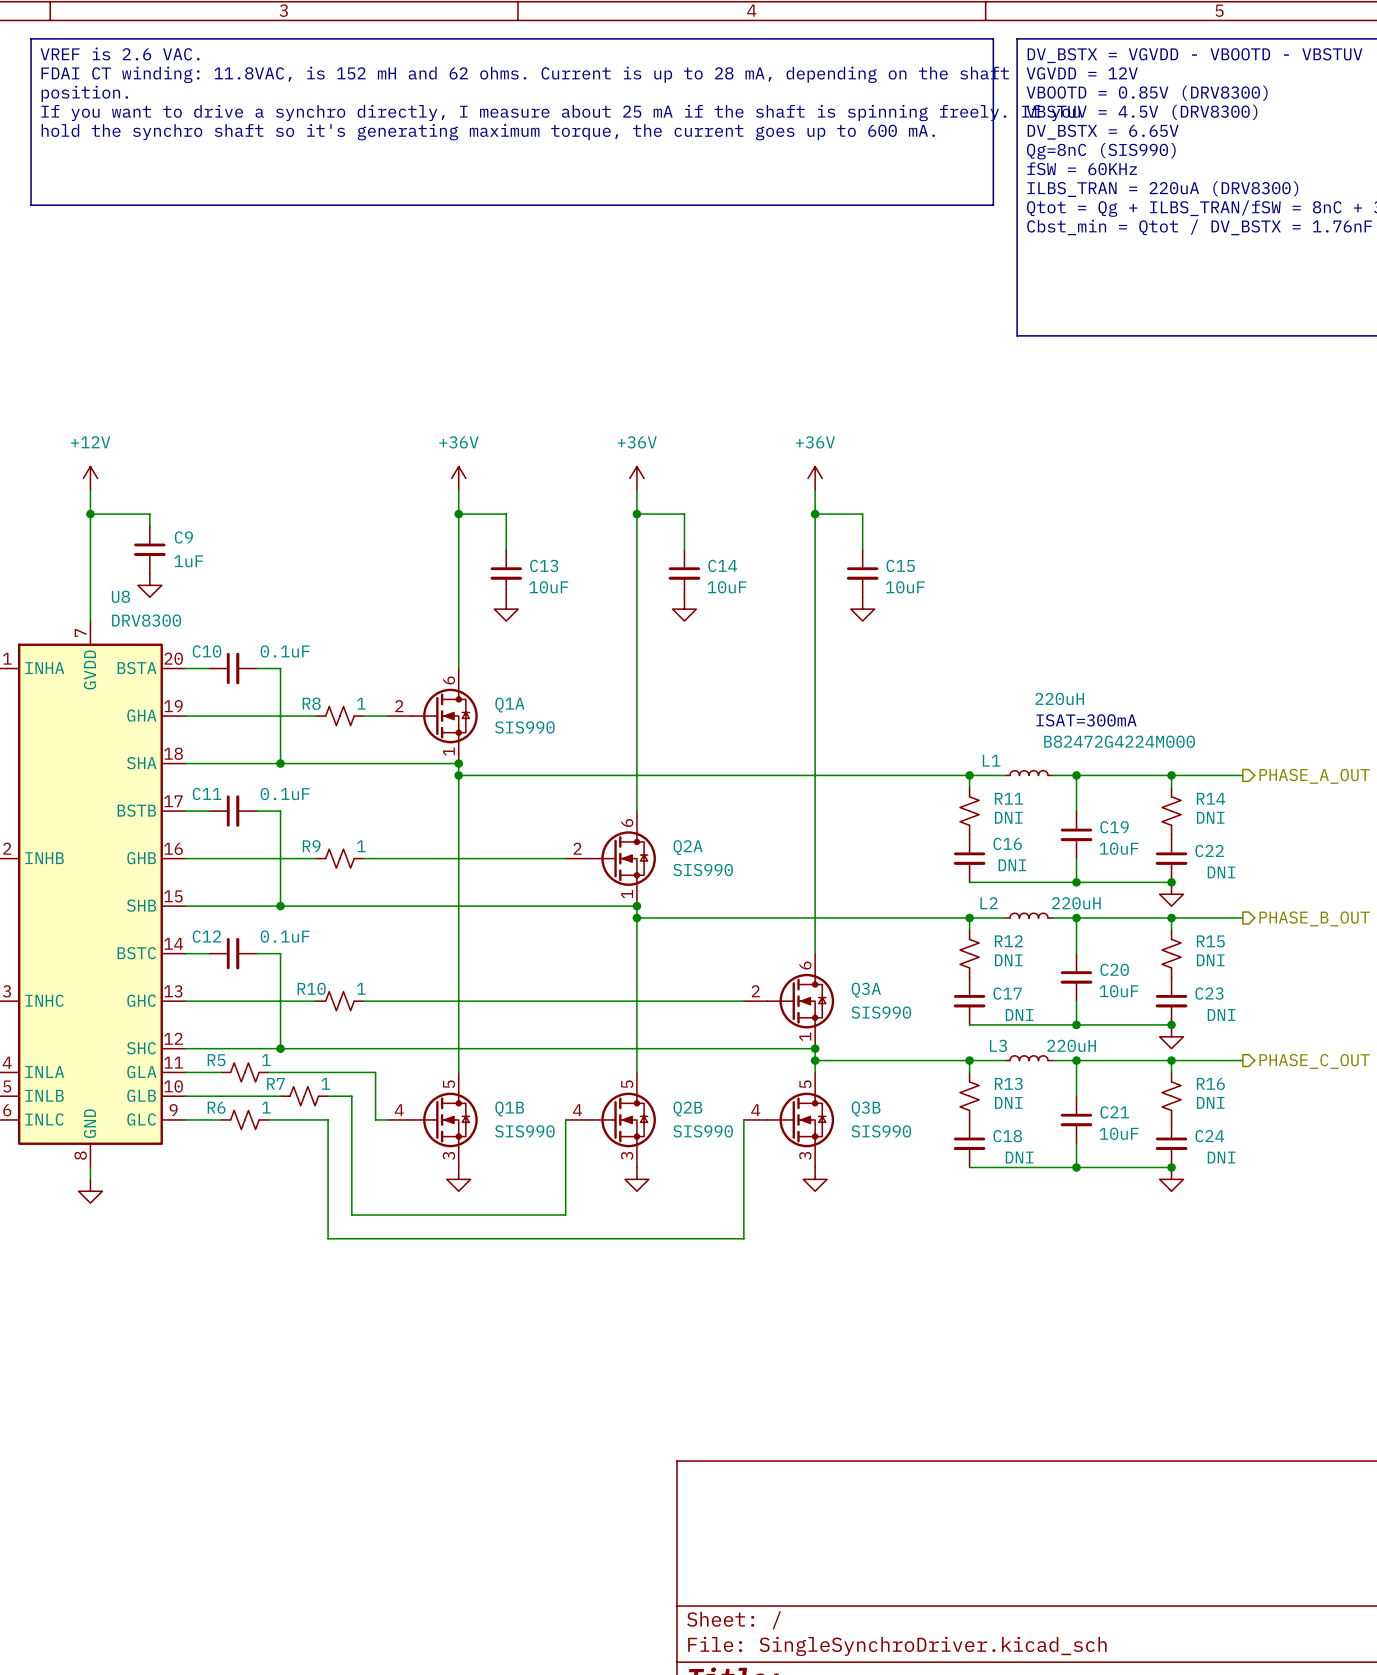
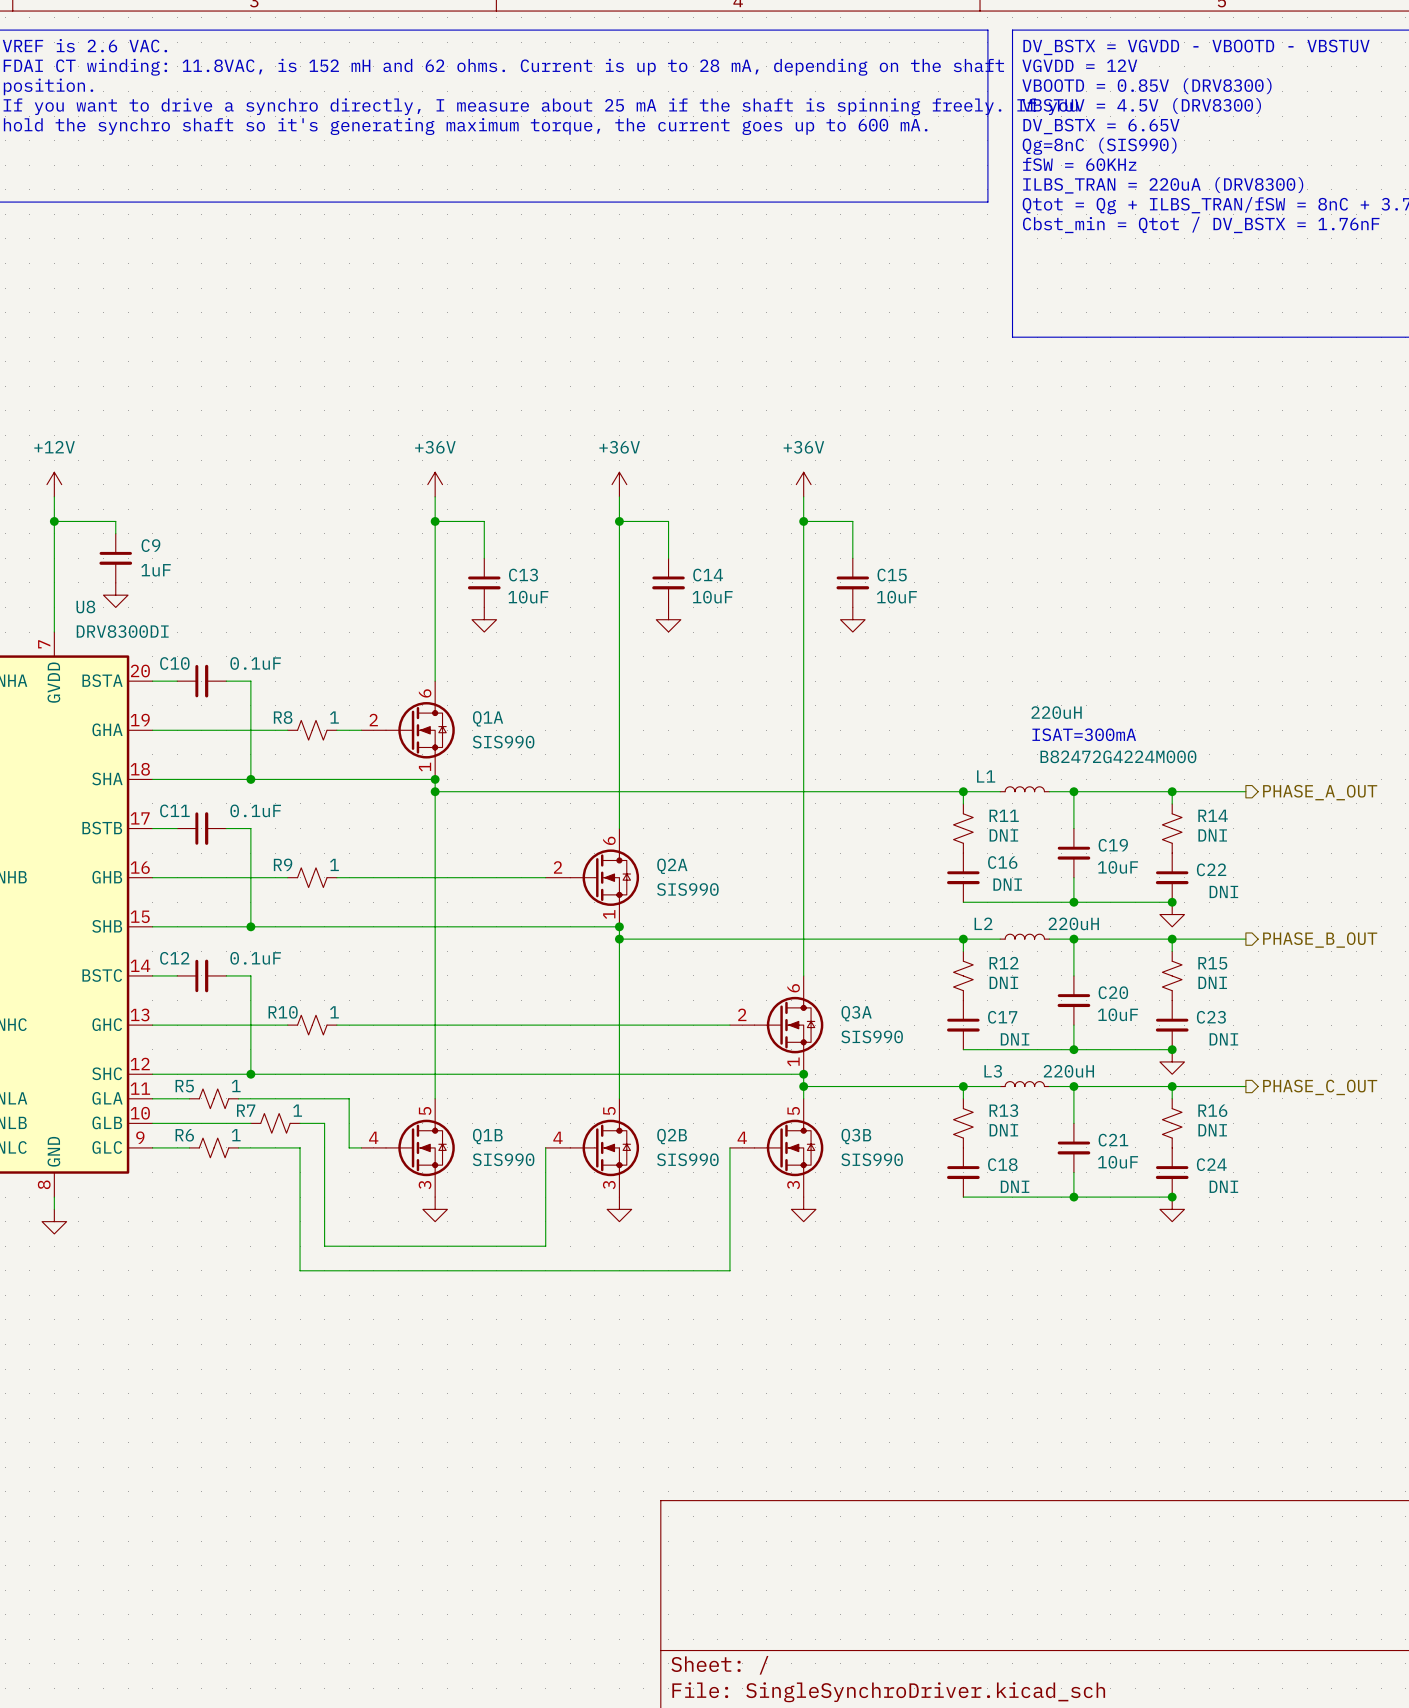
U8 value: DRV8300 (146, 620) -> DRV8300DI (122, 631)

